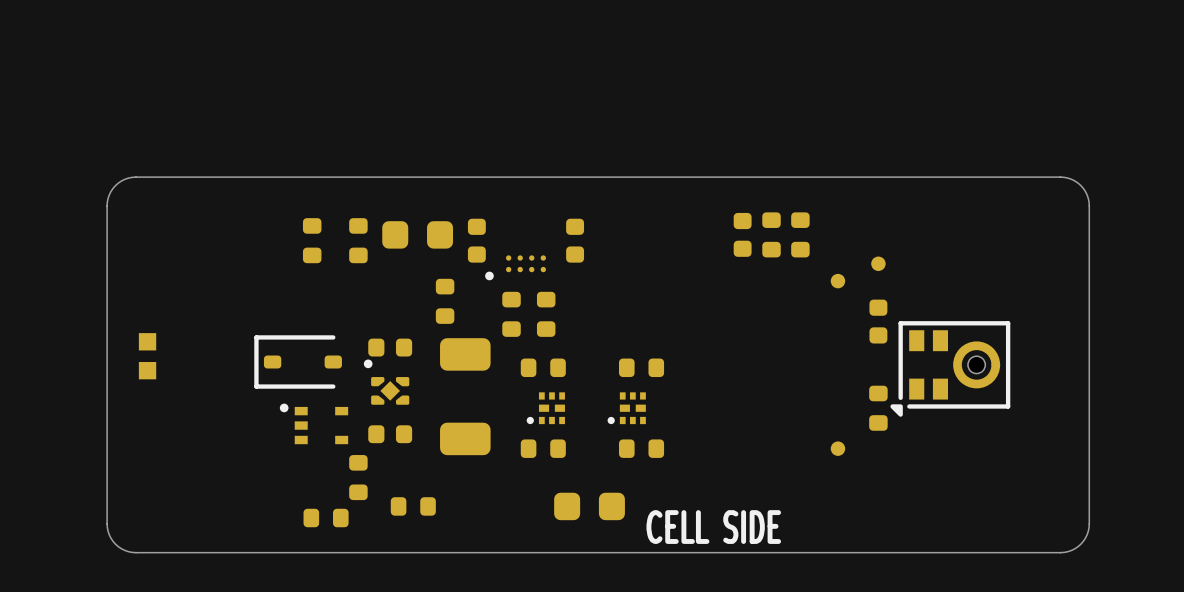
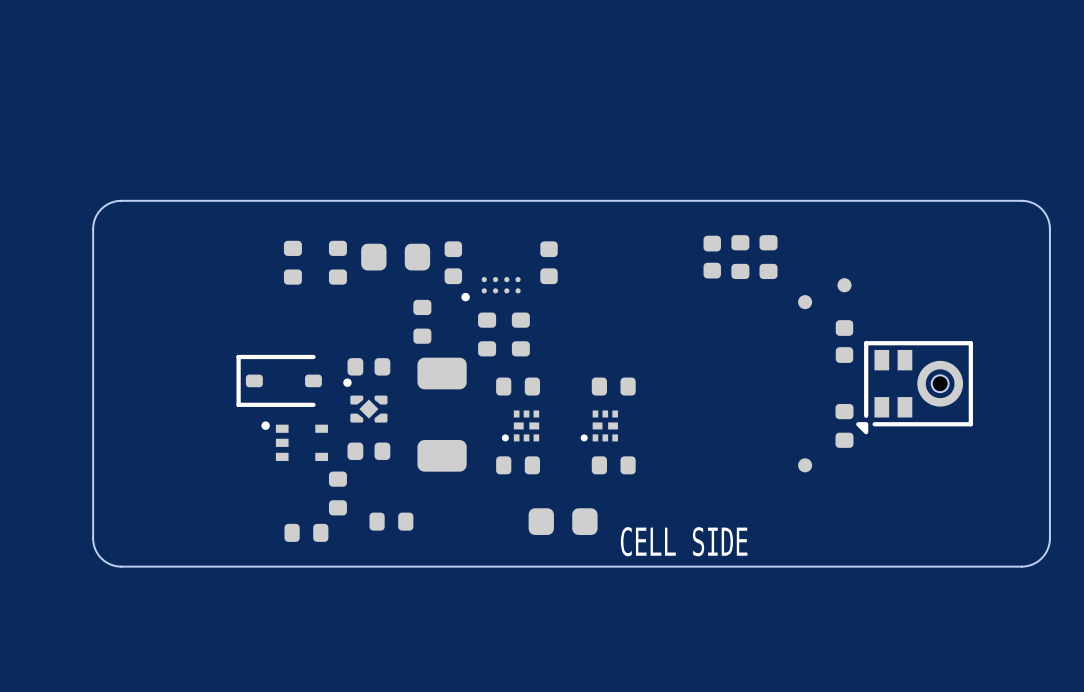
part: (147, 356) -> none

